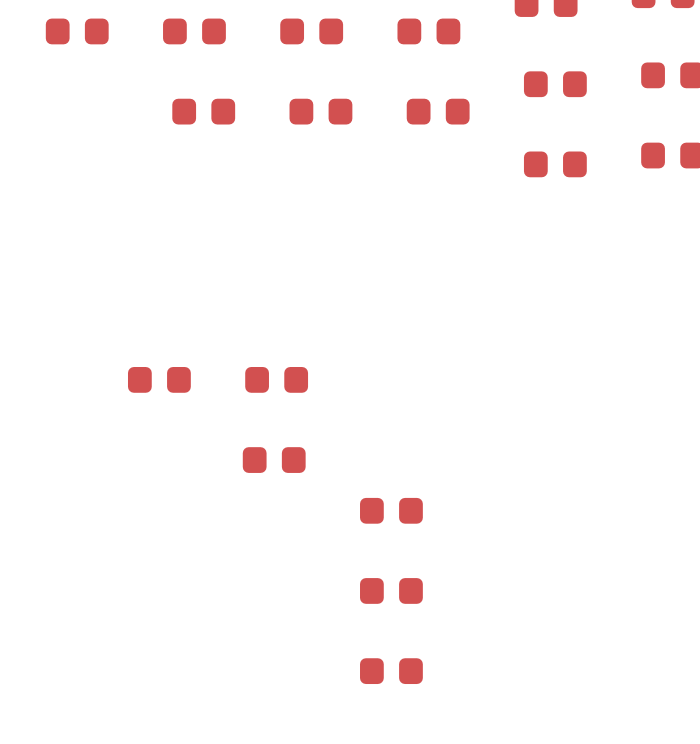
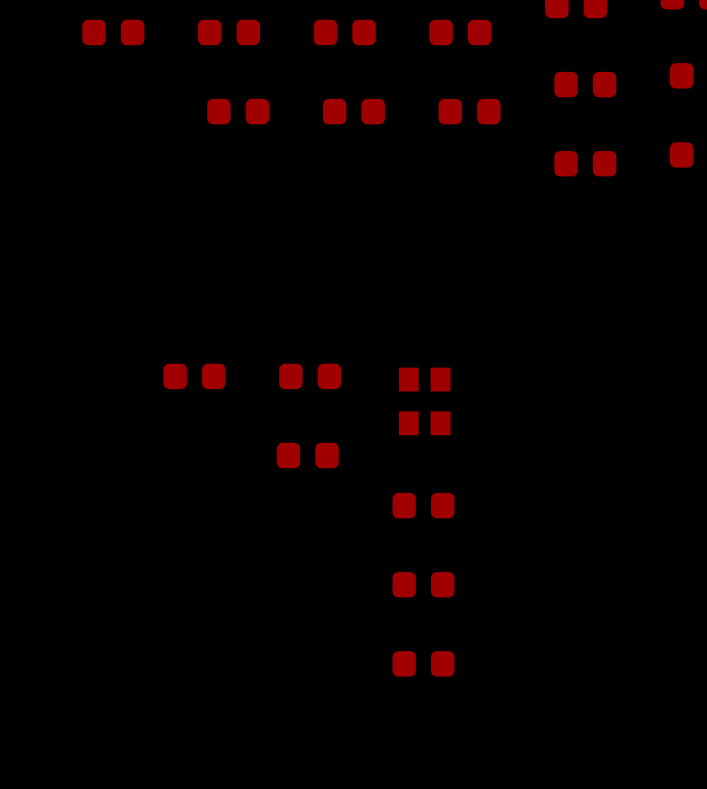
part: none -> (424, 401)

